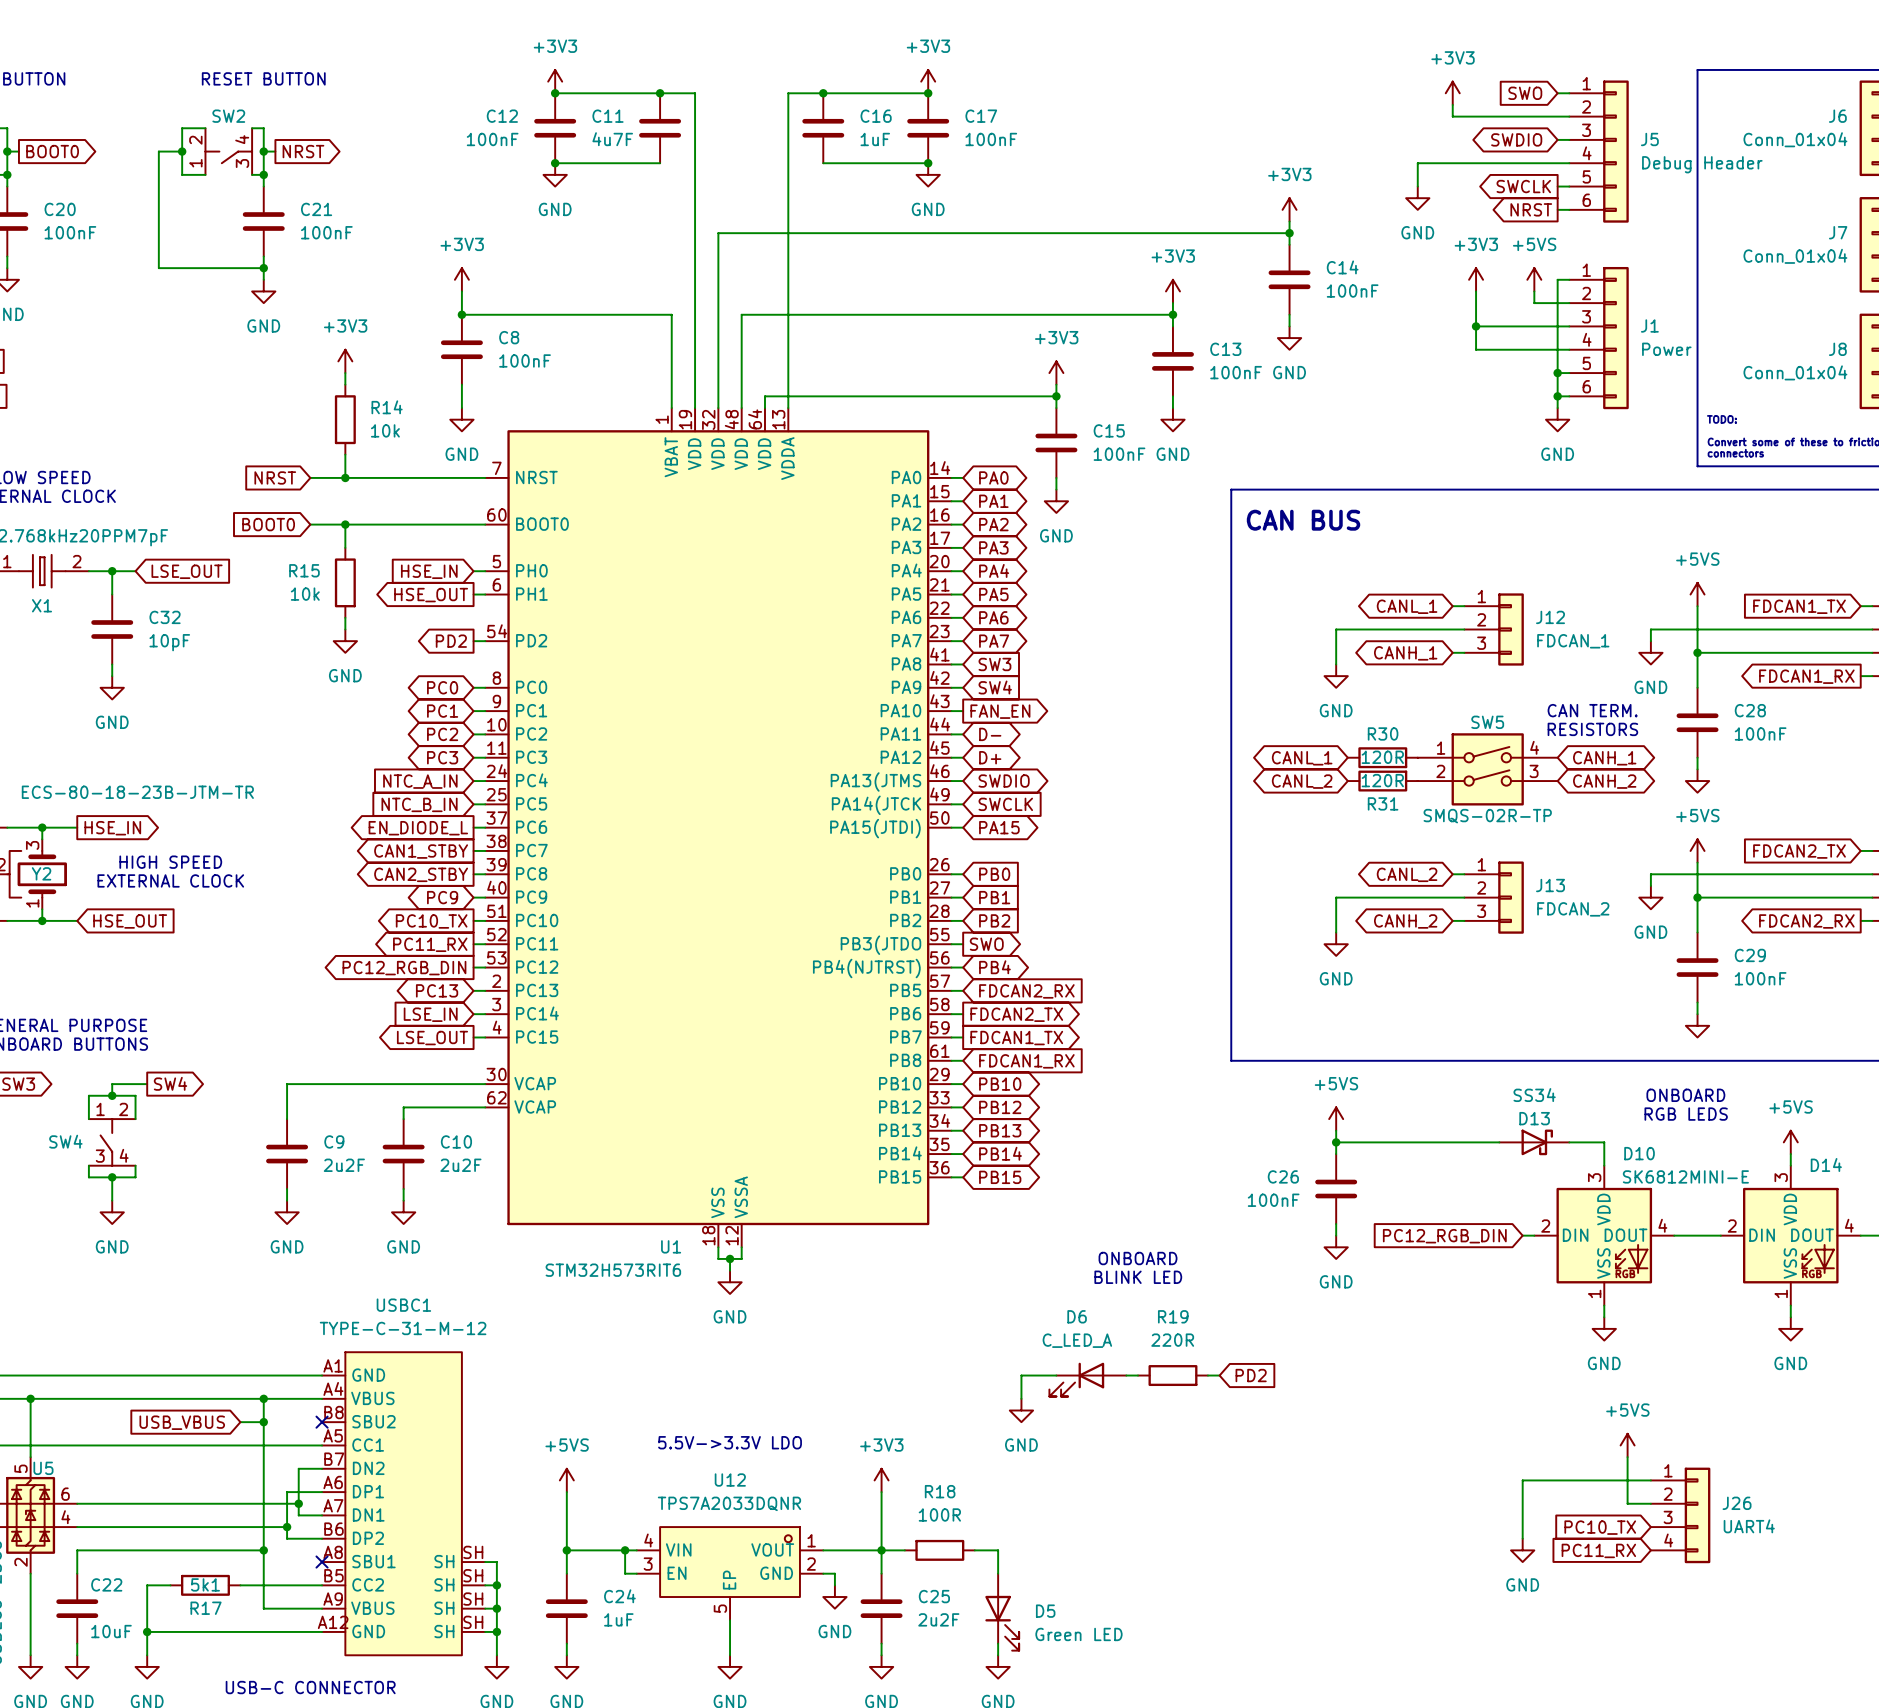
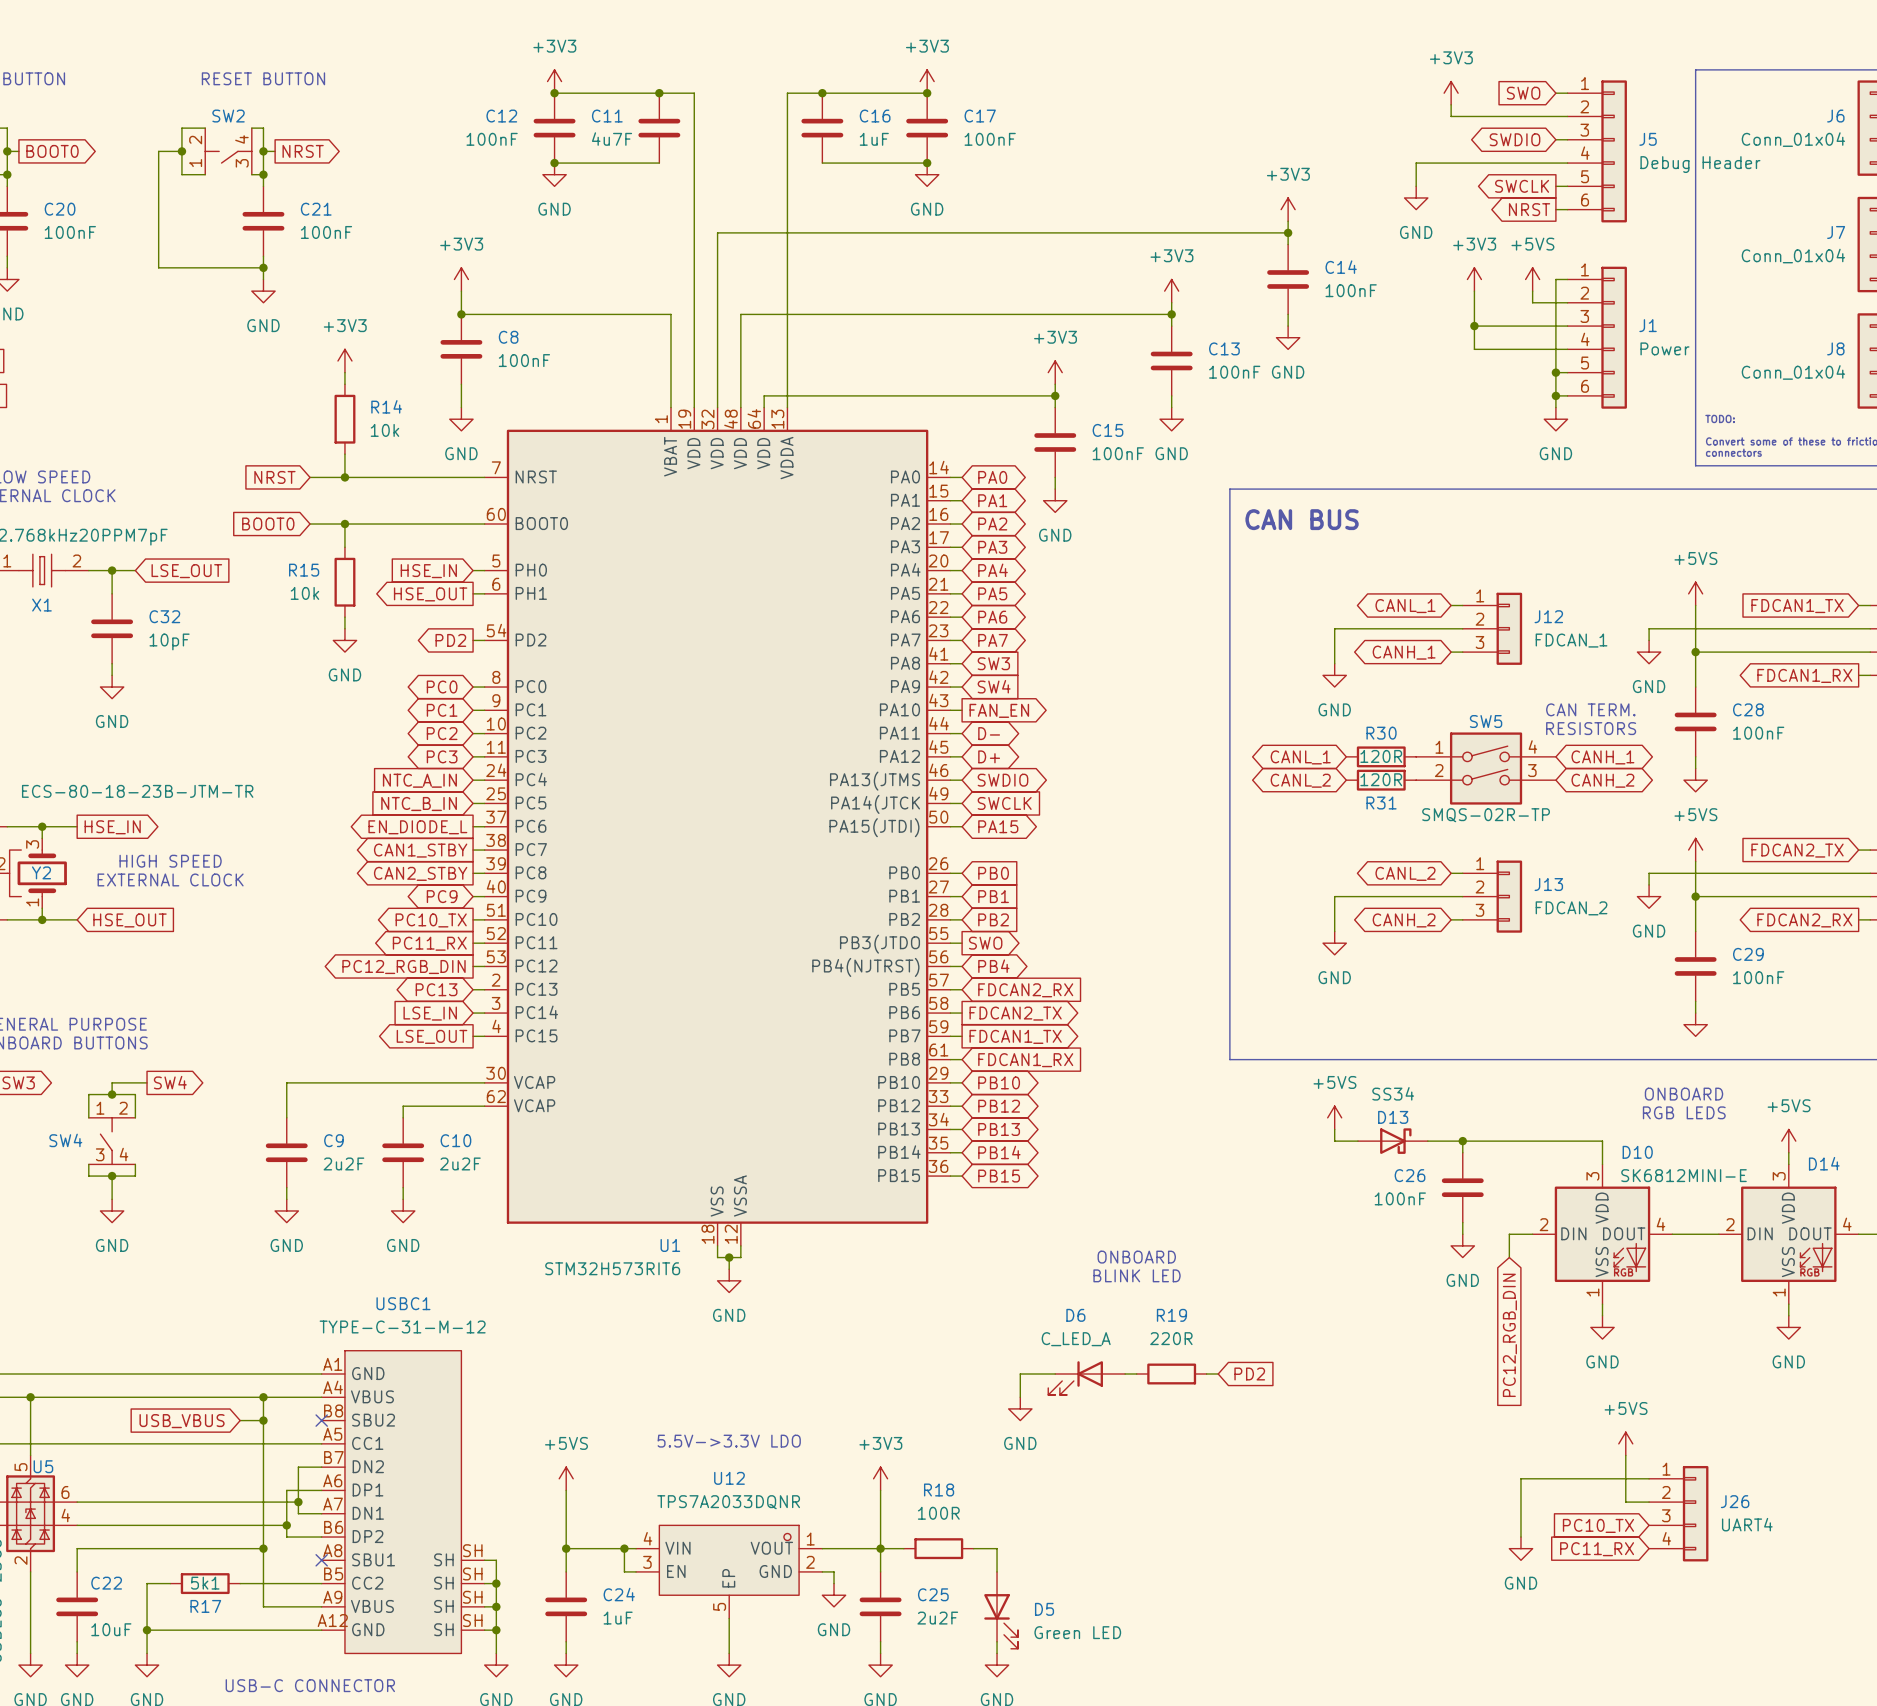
wire: (1336, 1142) (1336, 1154) -> (1462, 1141) (1462, 1152)
junction: (1336, 1142) -> none
junction: none -> (1462, 1141)
D13 position: (1534, 1142) -> (1392, 1141)
C26 position: (1336, 1189) -> (1462, 1187)
wire: (1336, 1223) (1336, 1235) -> (1462, 1222) (1462, 1234)
wire: none -> (1520, 1234) (1509, 1234) (1509, 1257)
global label rotation: 0° (1444, 1236) -> 90° counterclockwise (1509, 1335)
power symbol position: GND (1336, 1247) -> GND (1462, 1245)

